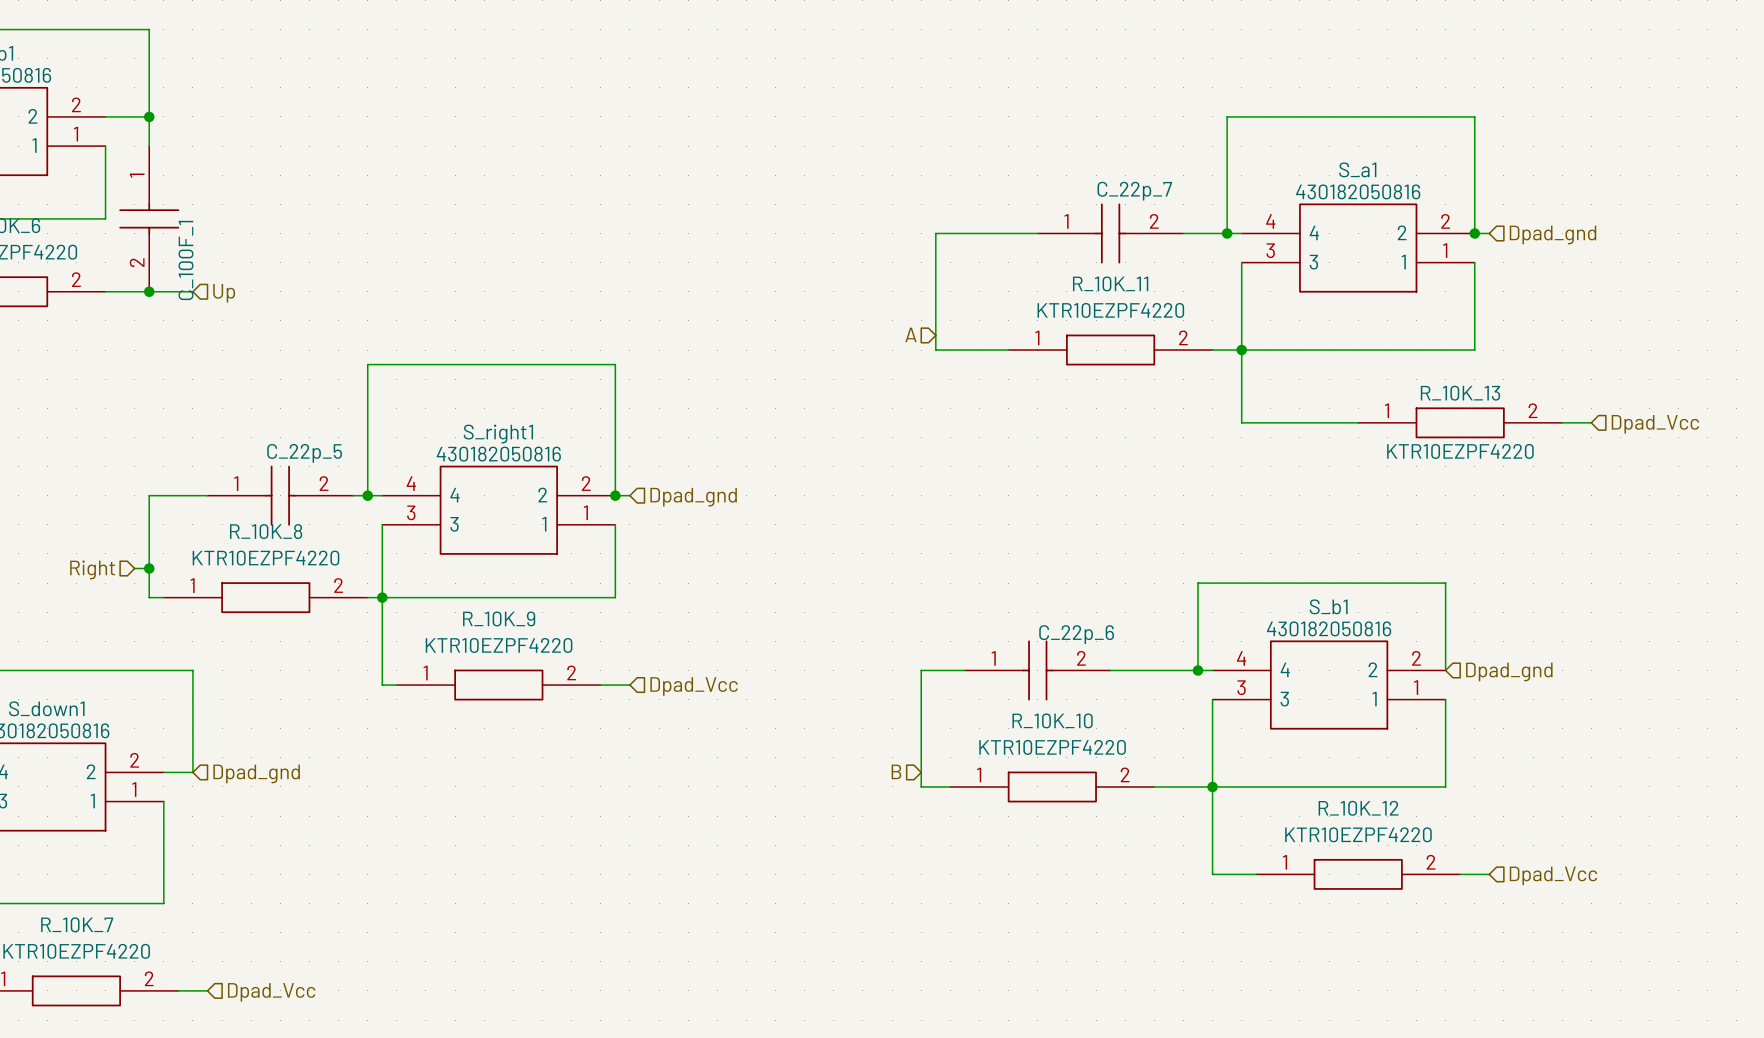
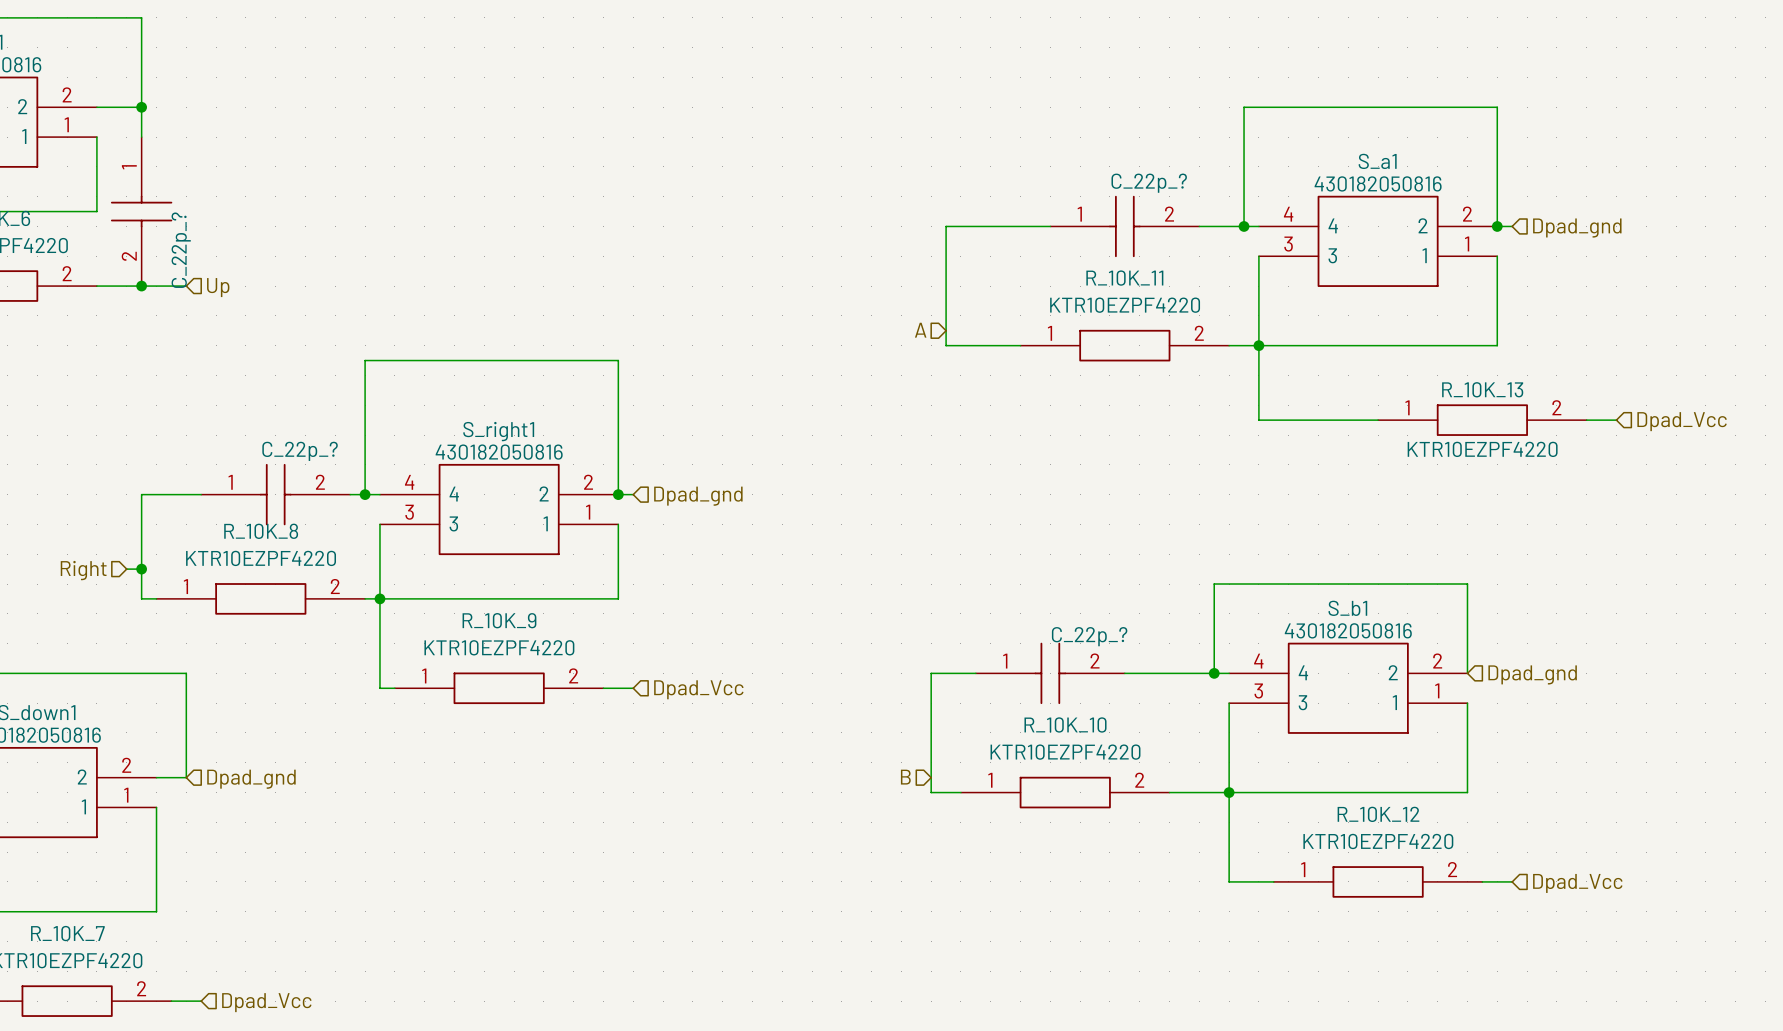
C_22p_7 name: C_22p_7 (1134, 191) -> C_22p_? (1149, 183)
C_100F_1 name: C_100F_1 (185, 260) -> C_22p_? (181, 250)
C_22p_5 name: C_22p_5 (304, 453) -> C_22p_? (300, 451)
C_22p_6 name: C_22p_6 (1076, 634) -> C_22p_? (1089, 636)

